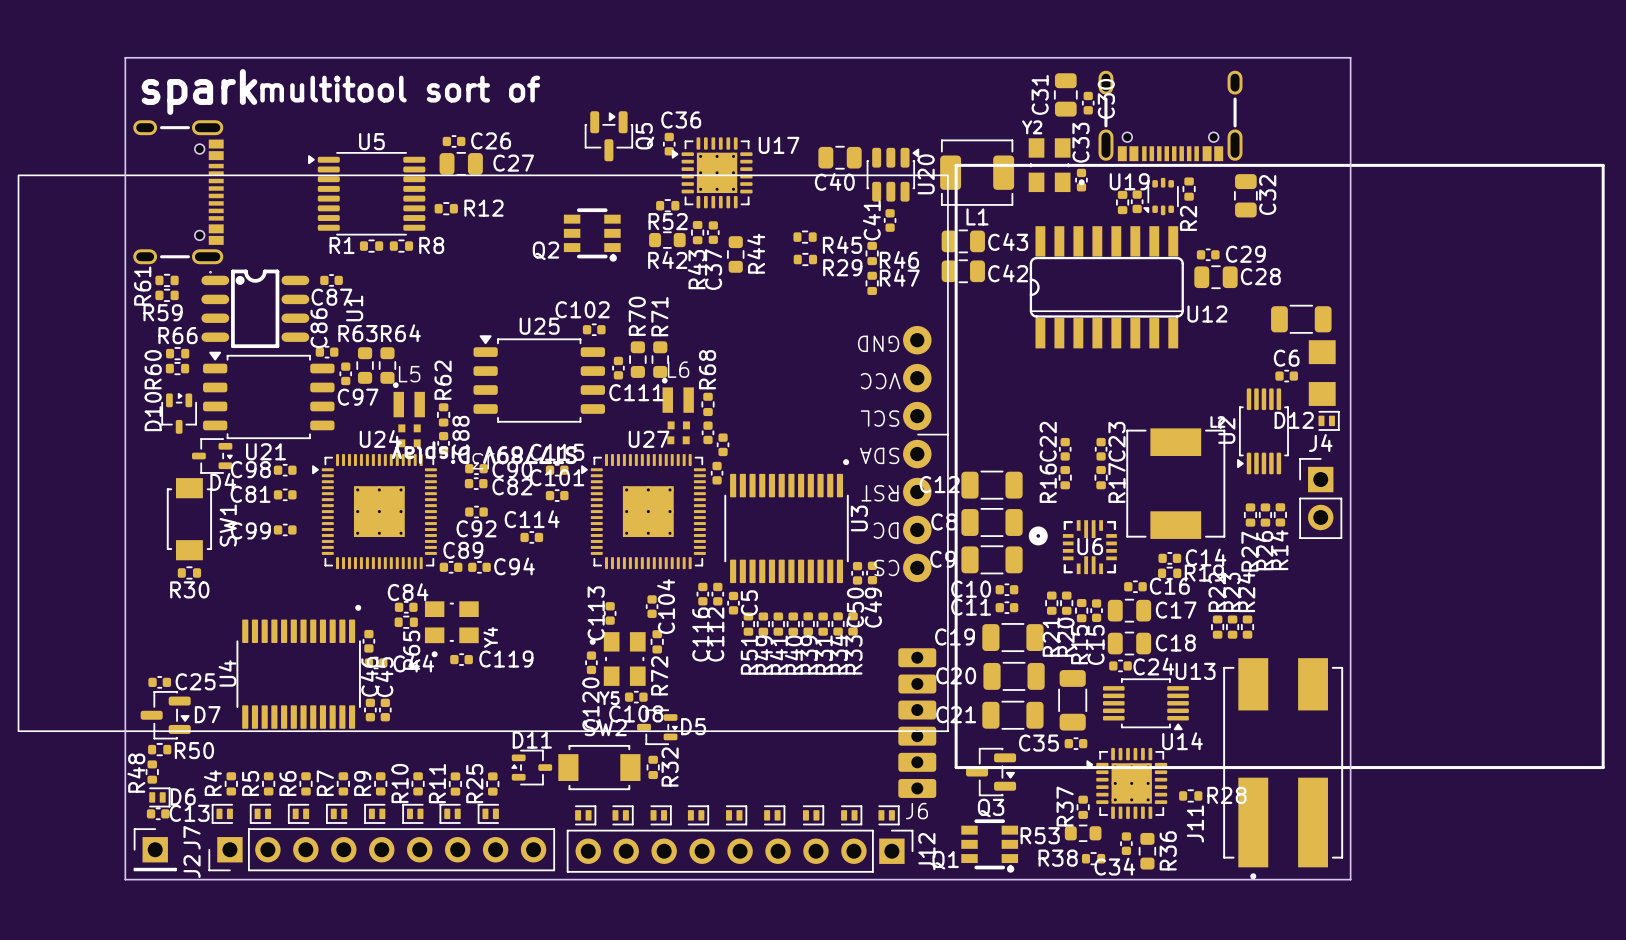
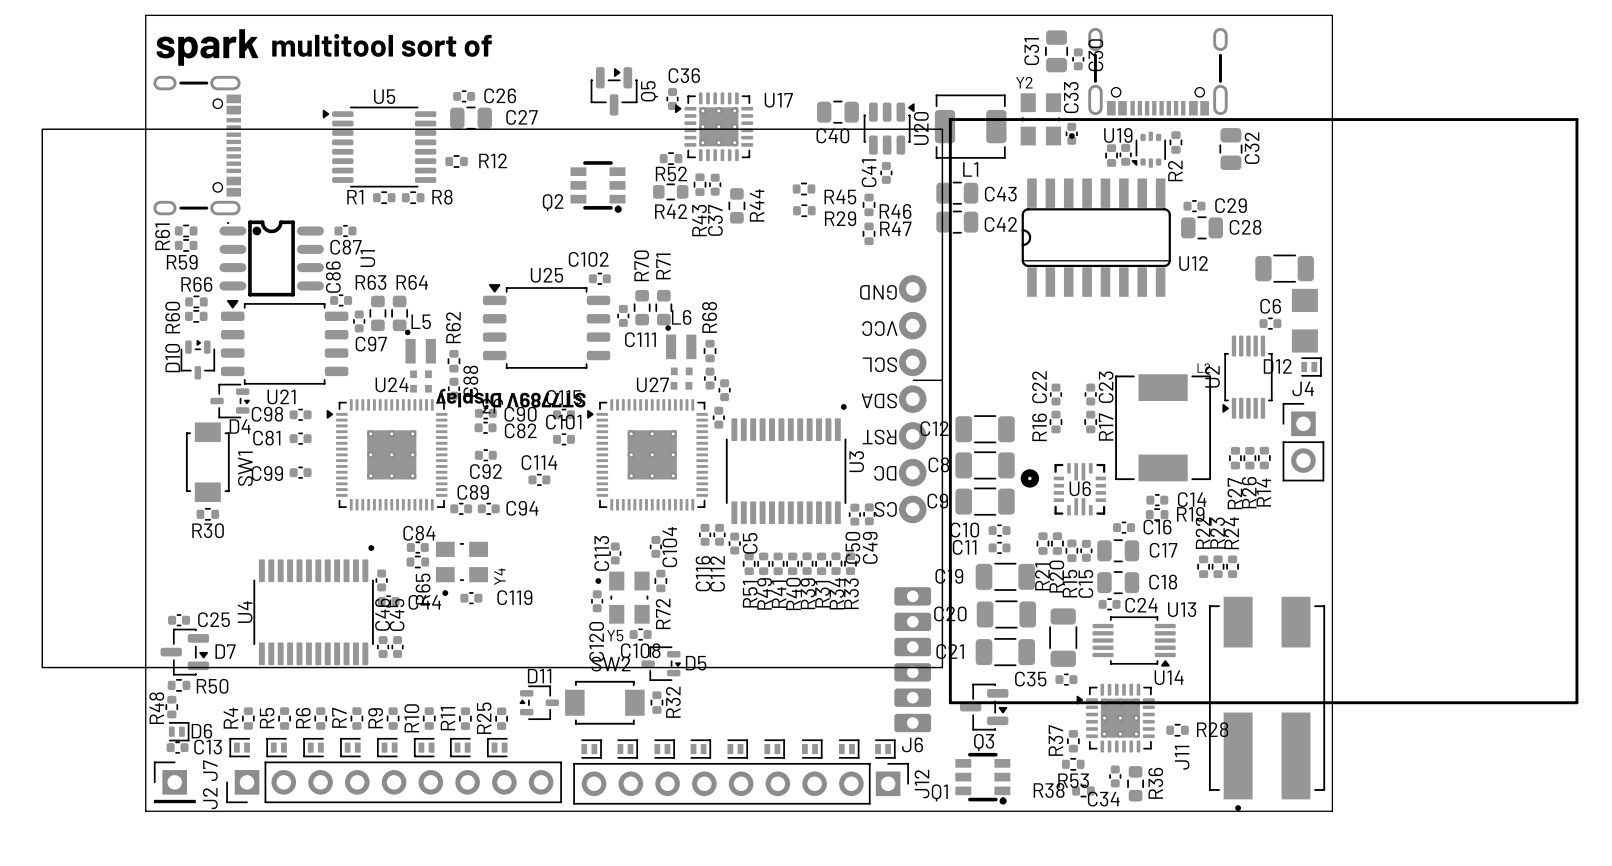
R53 footprint: [1064, 824, 1102, 843] -> [1061, 757, 1085, 771]
R53 name position: R53 (1040, 835) -> R53 (1073, 780)

